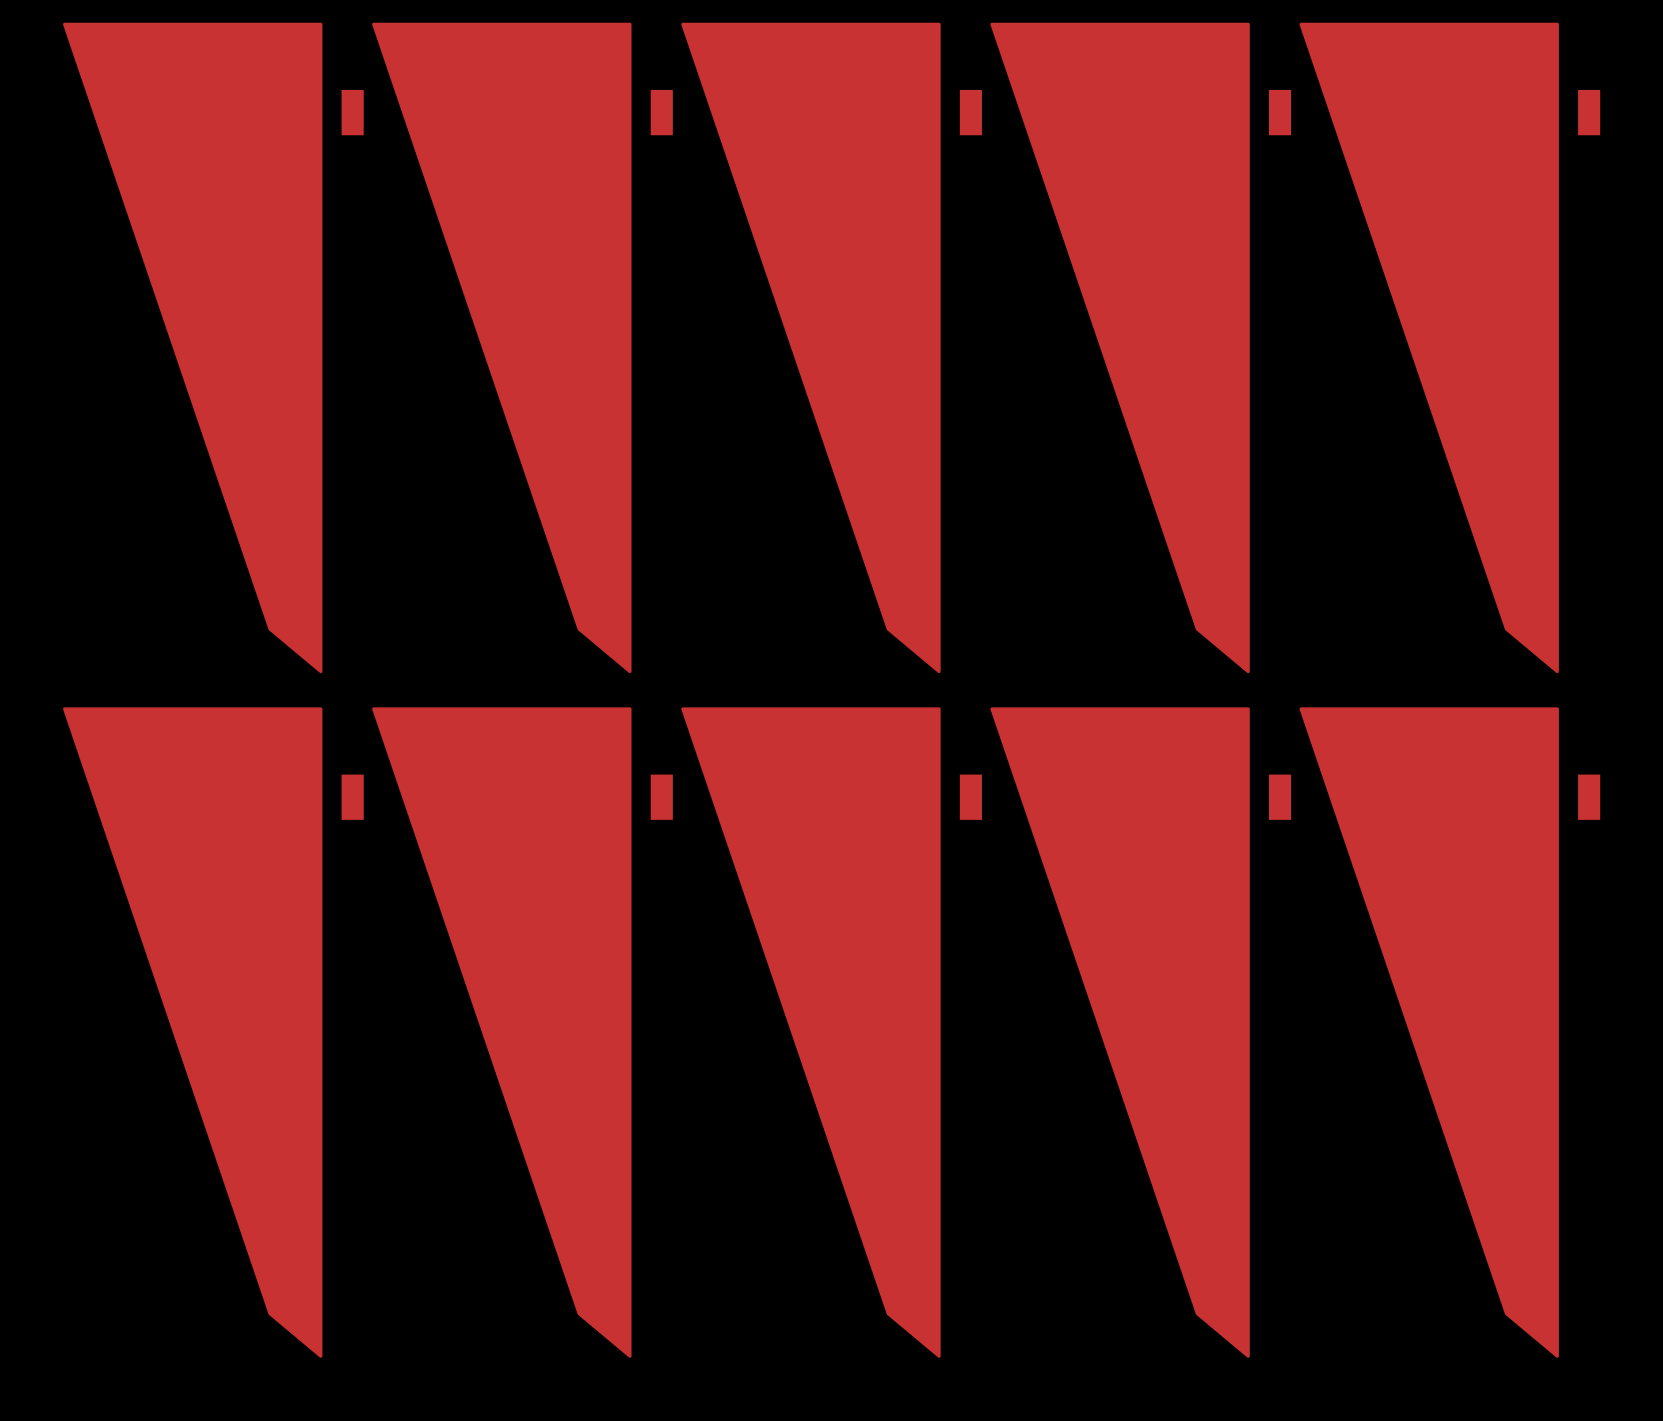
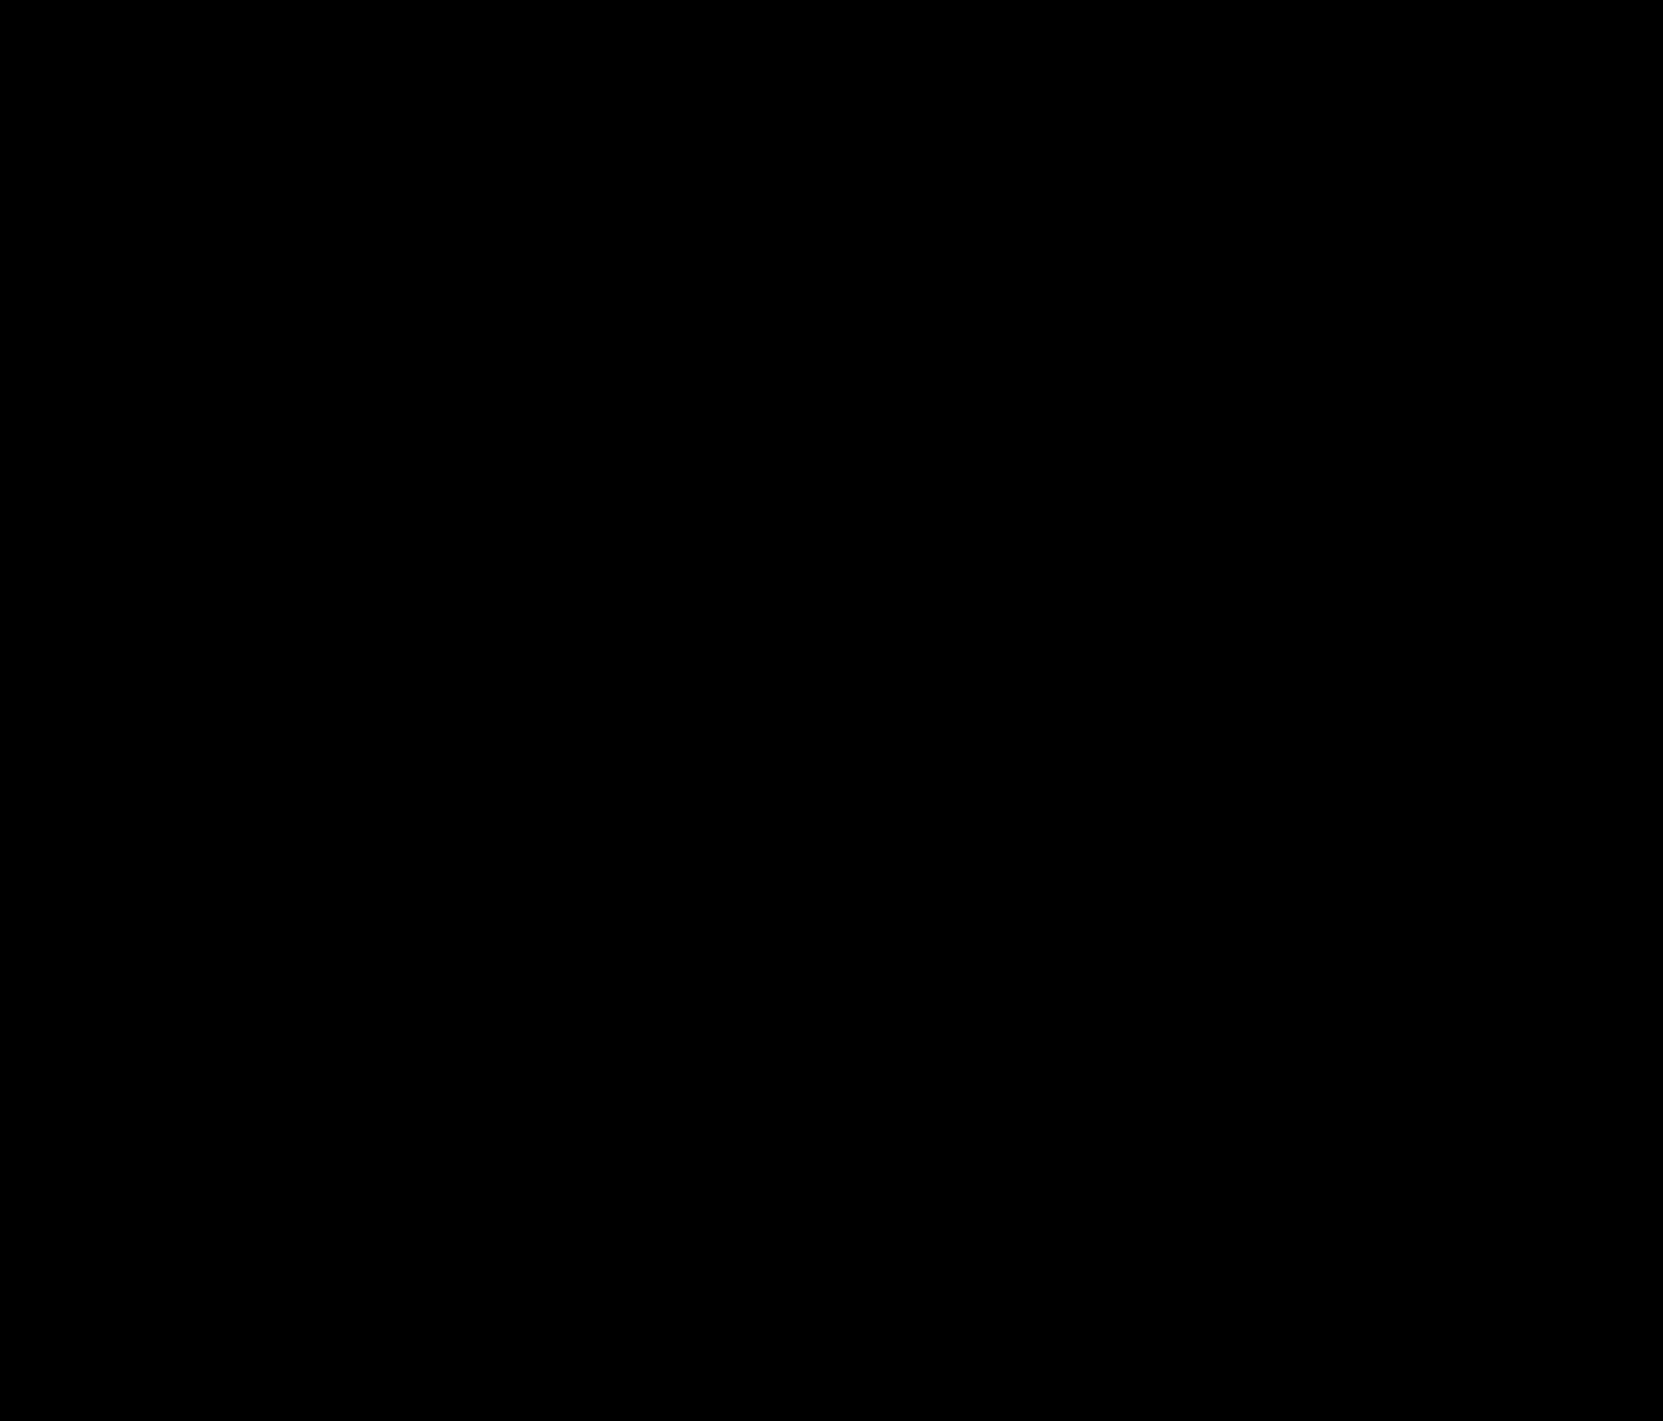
part: (213, 347) -> none
part: (522, 347) -> none
part: (831, 347) -> none
part: (1140, 347) -> none
part: (1449, 347) -> none
part: (213, 1032) -> none
part: (522, 1032) -> none
part: (831, 1032) -> none
part: (1140, 1032) -> none
part: (1449, 1032) -> none

